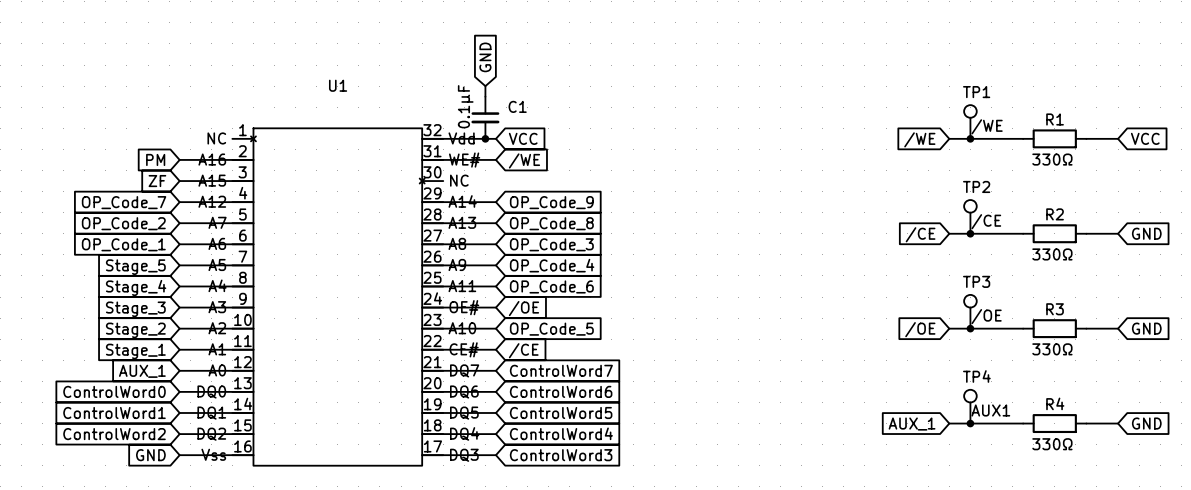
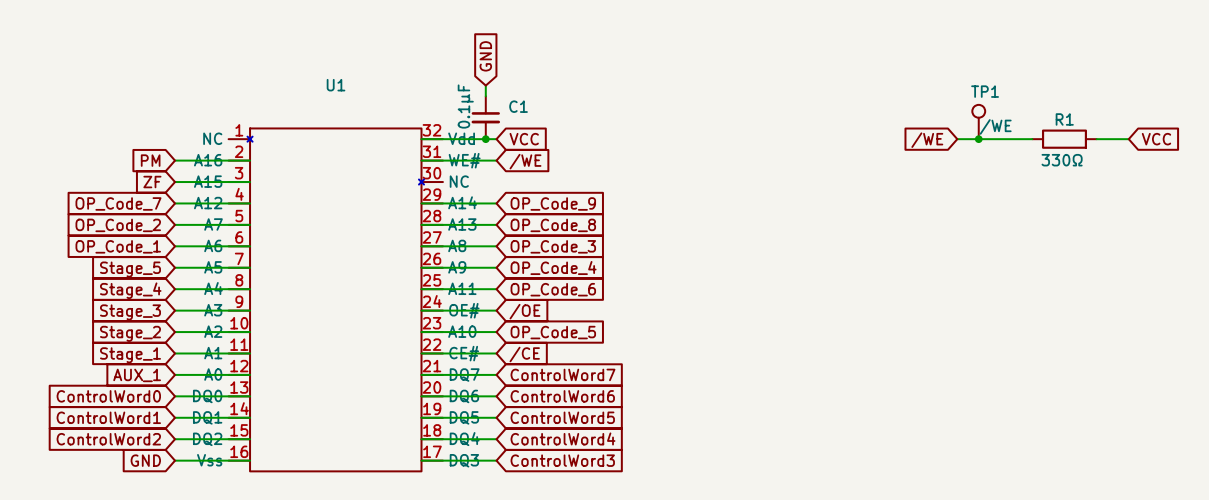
TP2: /CE (970, 216) -> none
wire: (949, 233) (1023, 233) -> none
junction: (970, 233) -> none
R2: 330Ω (1054, 233) -> none
wire: (1086, 233) (1118, 233) -> none
global label: GND (1146, 233) -> none
global label: /CE (920, 234) -> none
TP3: /OE (970, 311) -> none
wire: (949, 328) (1023, 328) -> none
junction: (970, 328) -> none
R3: 330Ω (1054, 328) -> none
wire: (1086, 328) (1118, 328) -> none
global label: GND (1146, 328) -> none
global label: /OE (920, 329) -> none
TP4: AUX1 (970, 406) -> none
wire: (949, 423) (1023, 423) -> none
junction: (970, 423) -> none
R4: 330Ω (1054, 423) -> none
wire: (1086, 423) (1118, 423) -> none
global label: GND (1146, 423) -> none
global label: AUX_1 (912, 424) -> none

